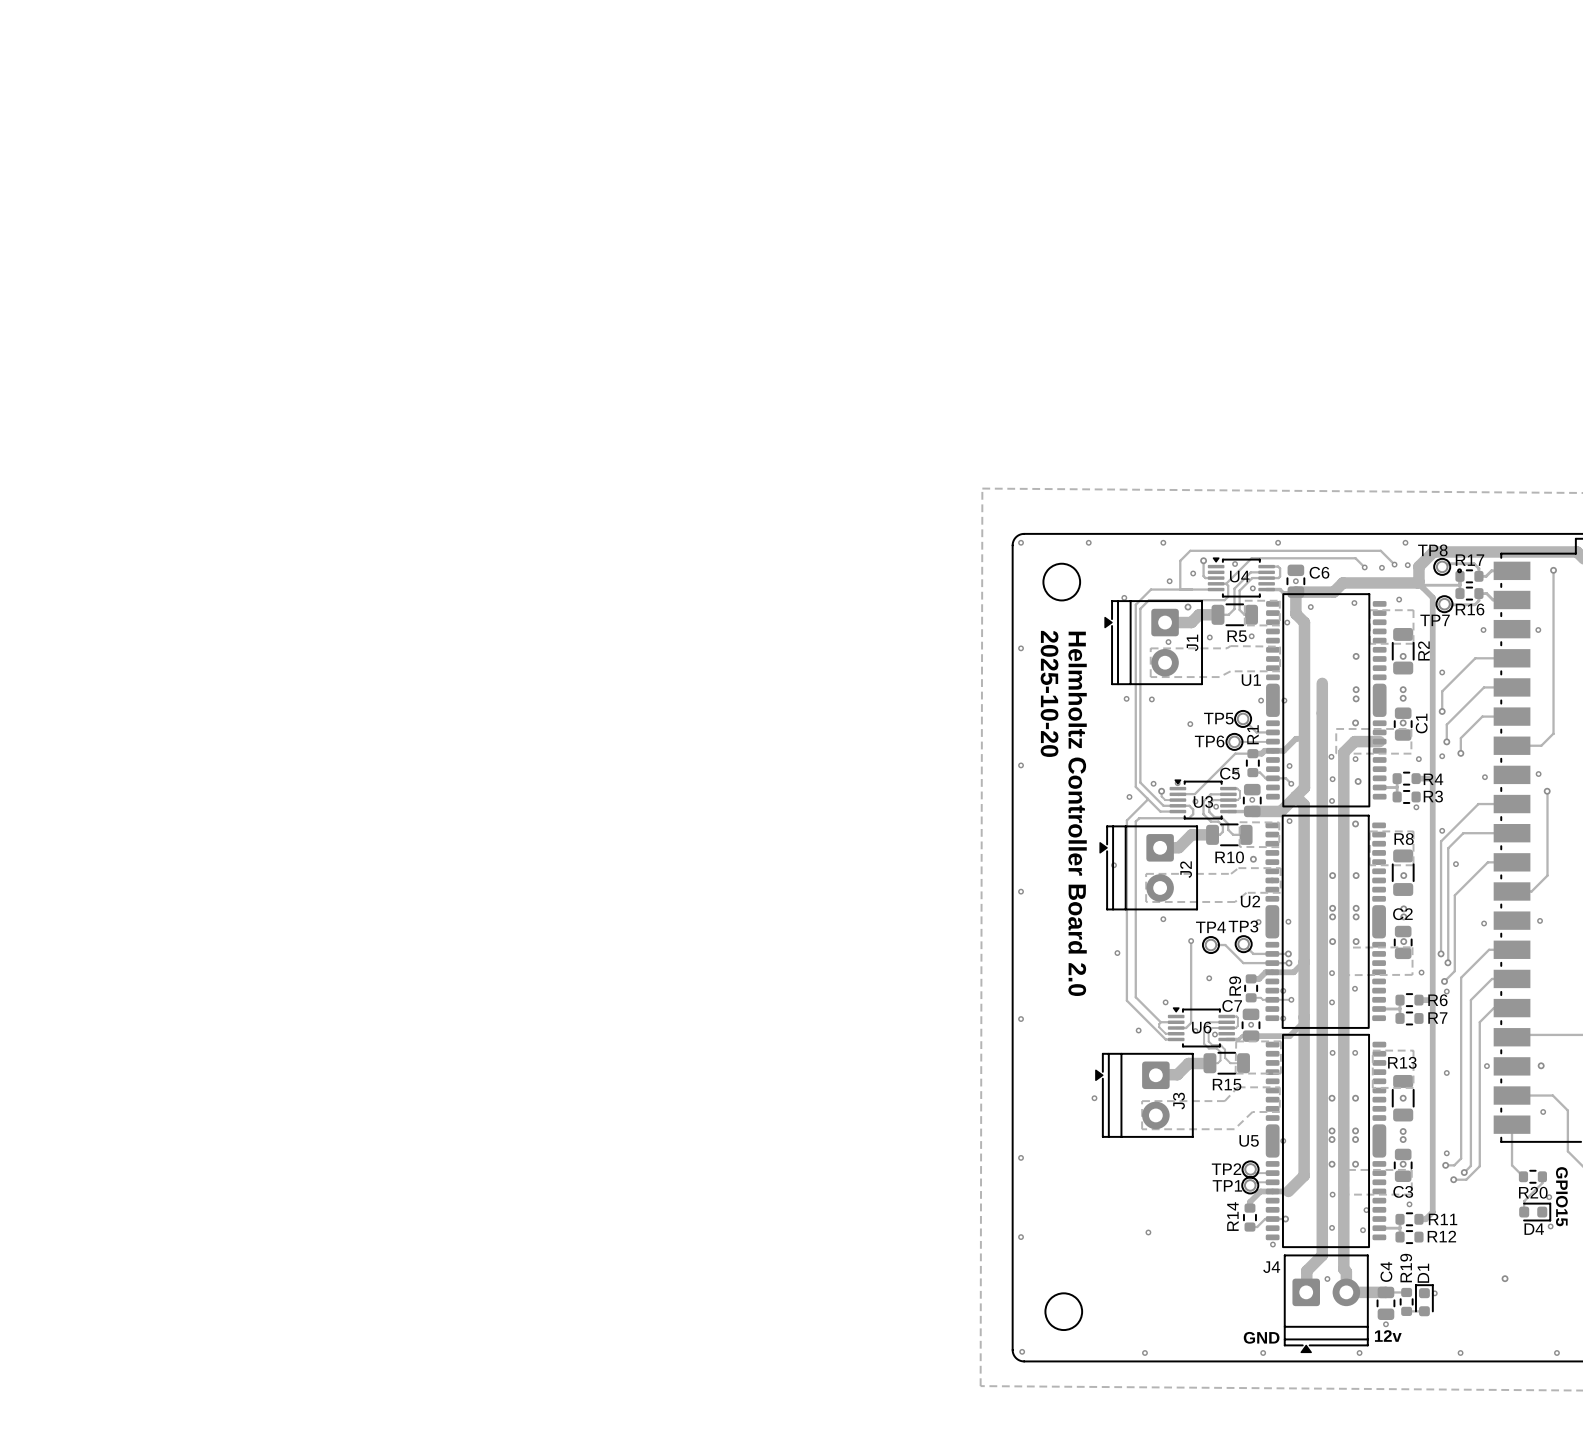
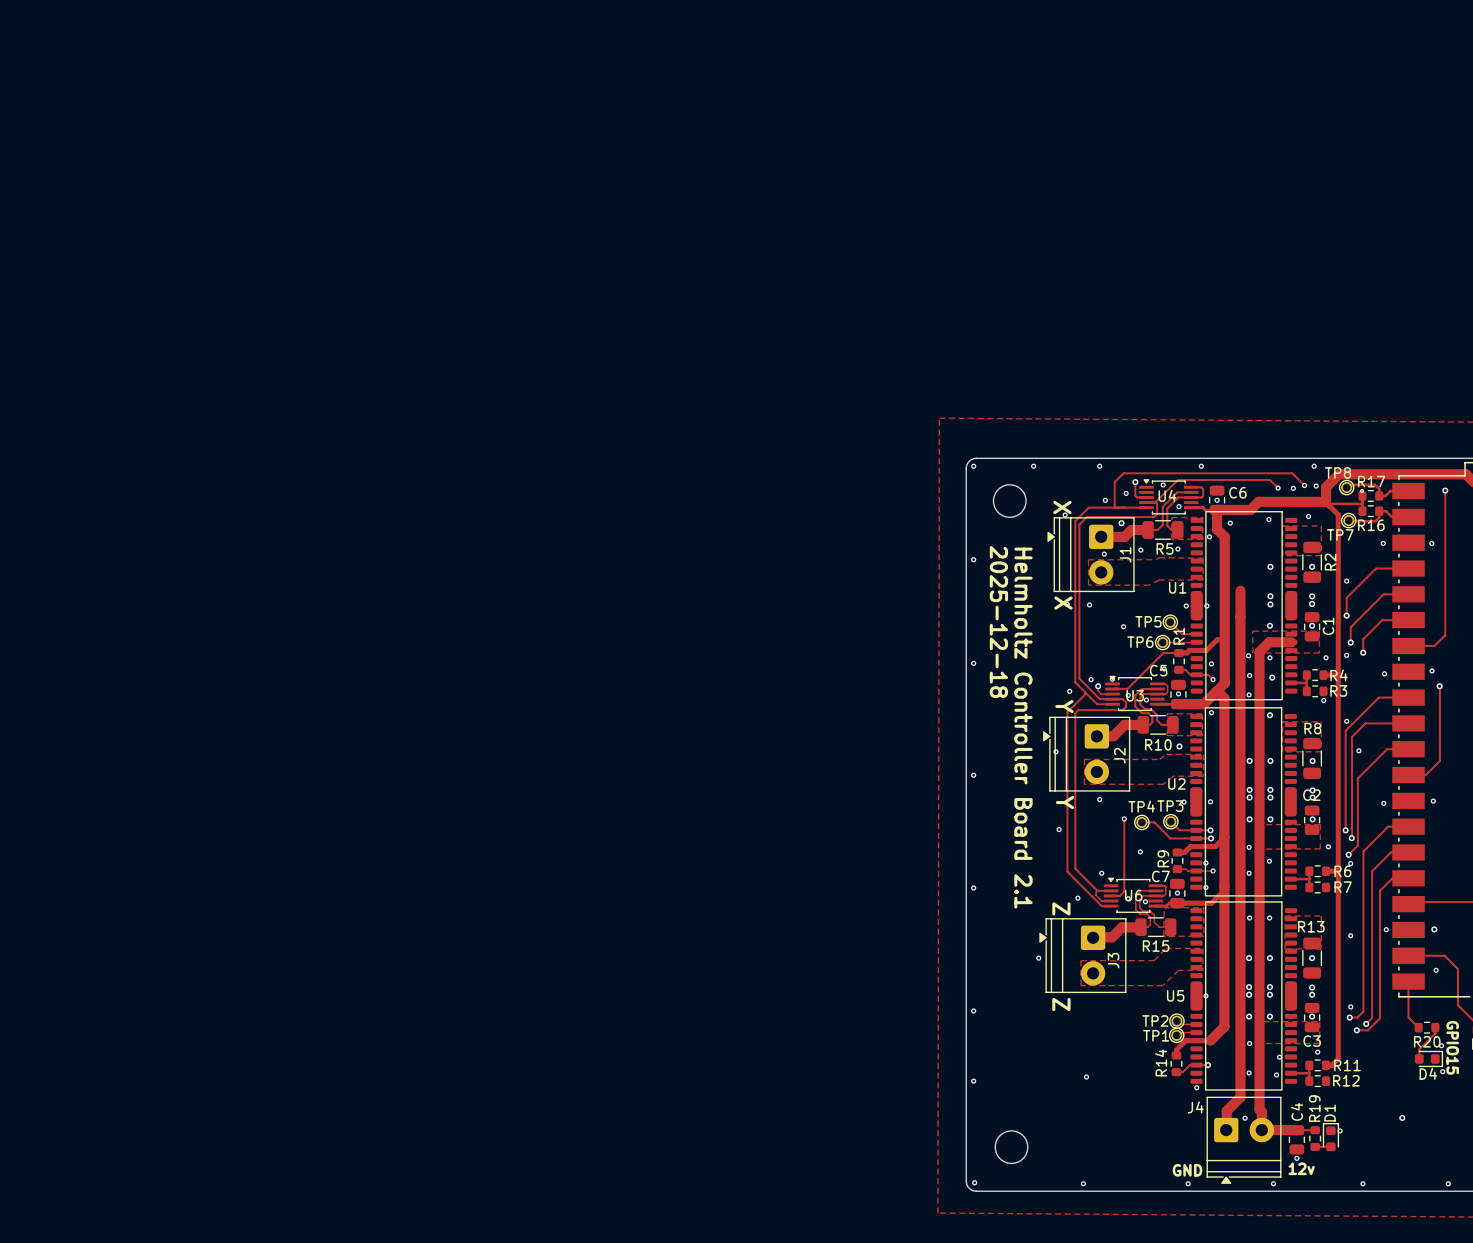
text: none -> X (1062, 507)
text: 2025-10-20 (1049, 693) -> 2025-12-18 (998, 622)
text: none -> X (1063, 603)
text: none -> Y (1064, 706)
text: Helmholtz Controller Board 2.0 (1077, 813) -> Helmholtz Controller Board 2.1 (1023, 728)
text: none -> Y (1064, 802)
text: none -> Z (1061, 908)
text: none -> Z (1061, 1004)

